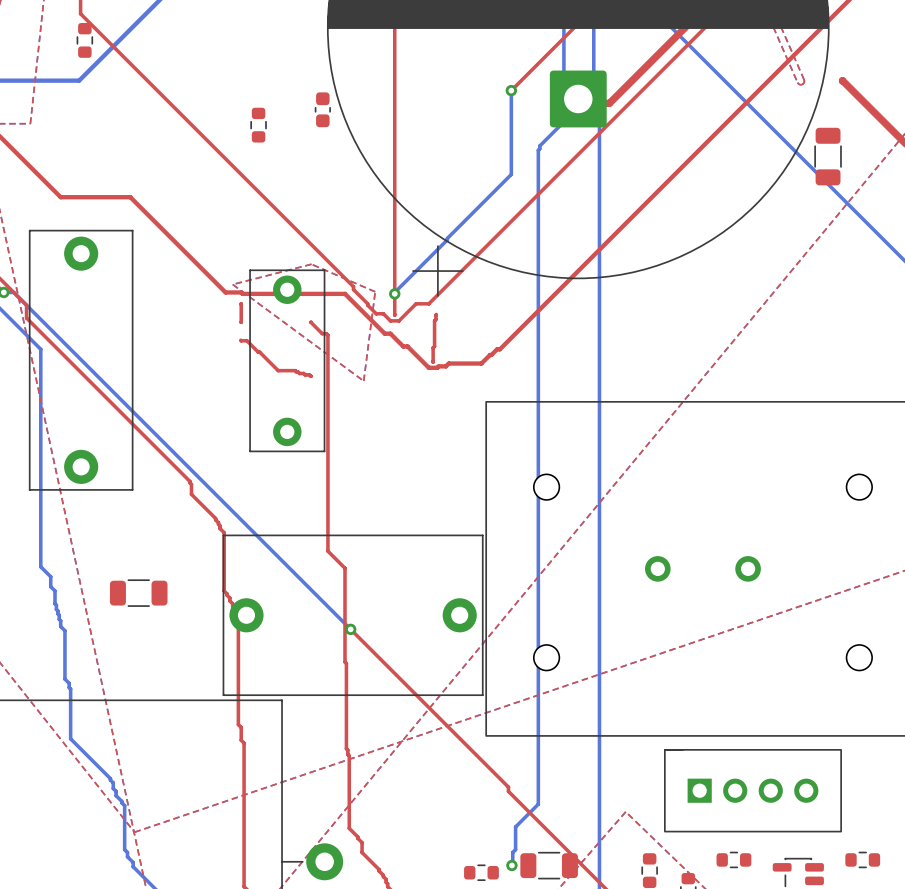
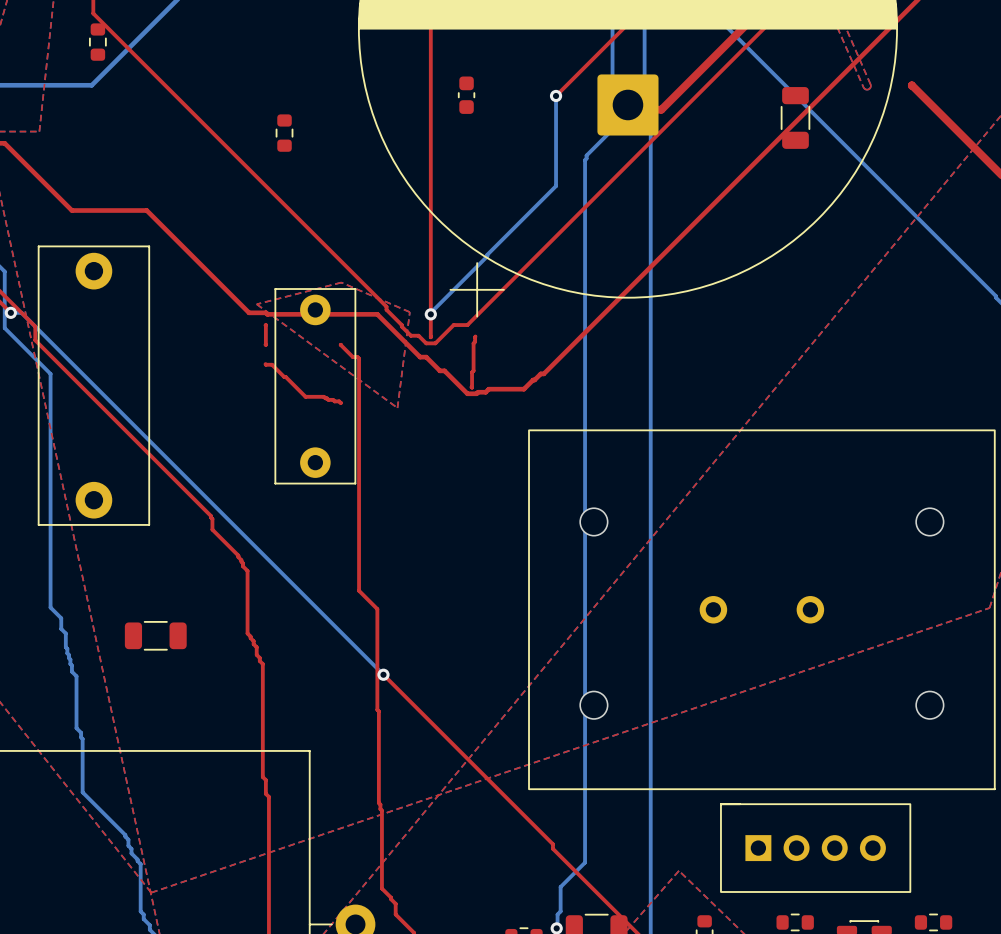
part position: (322, 109) -> (466, 95)
part position: (828, 156) -> (795, 117)
part: (353, 615) -> none

